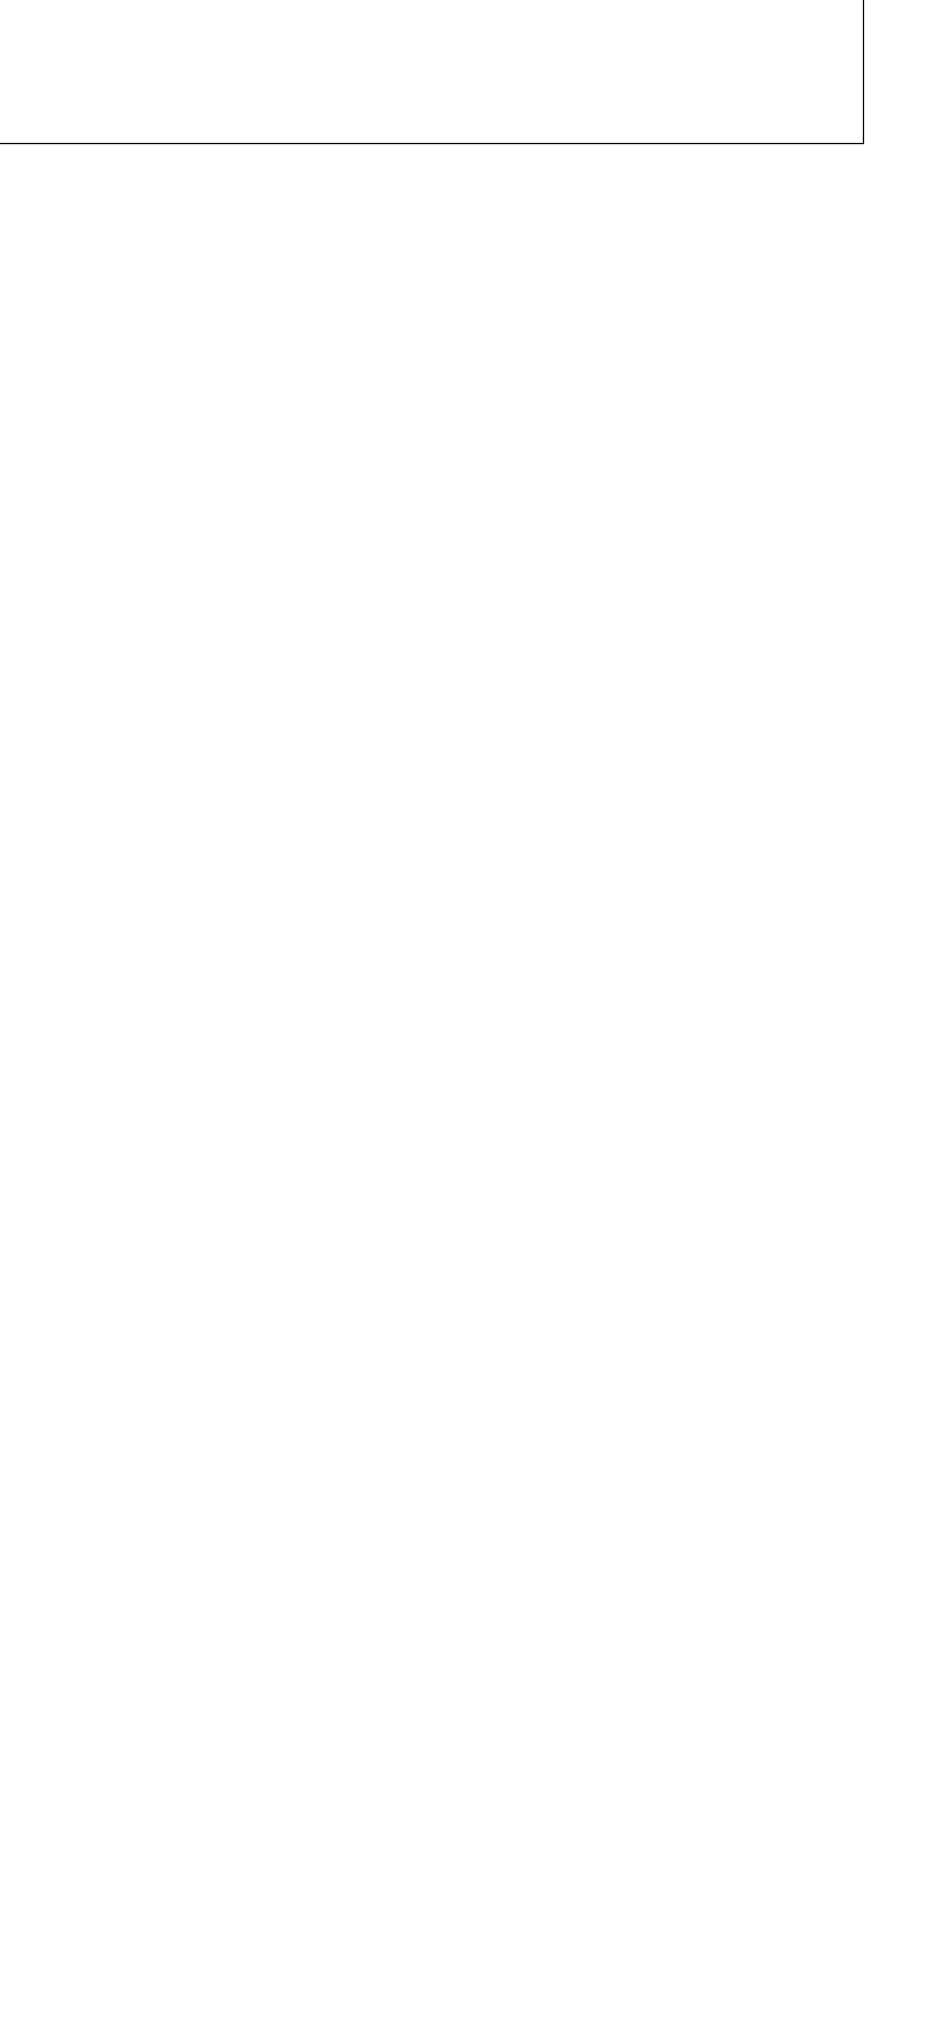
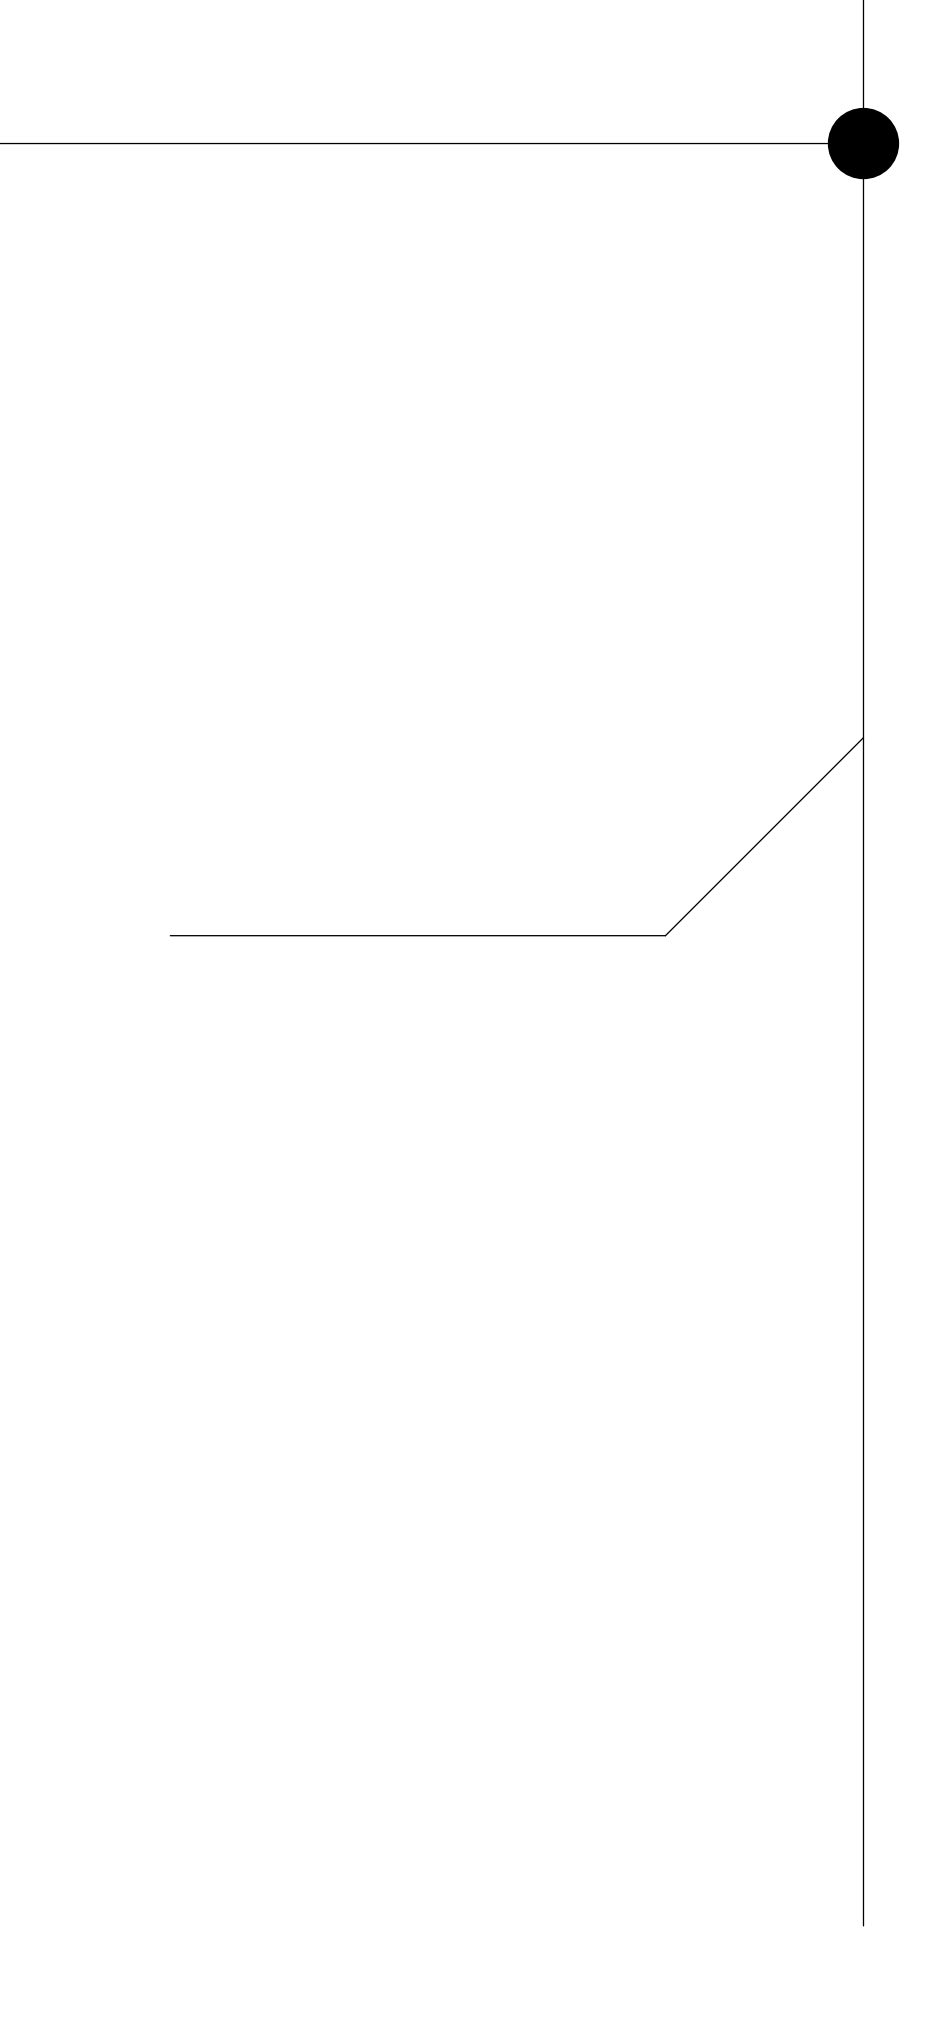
bus: none -> (863, 143) (863, 1925)
junction: none -> (863, 143)
wire: none -> (863, 737) (665, 935) (170, 935)

